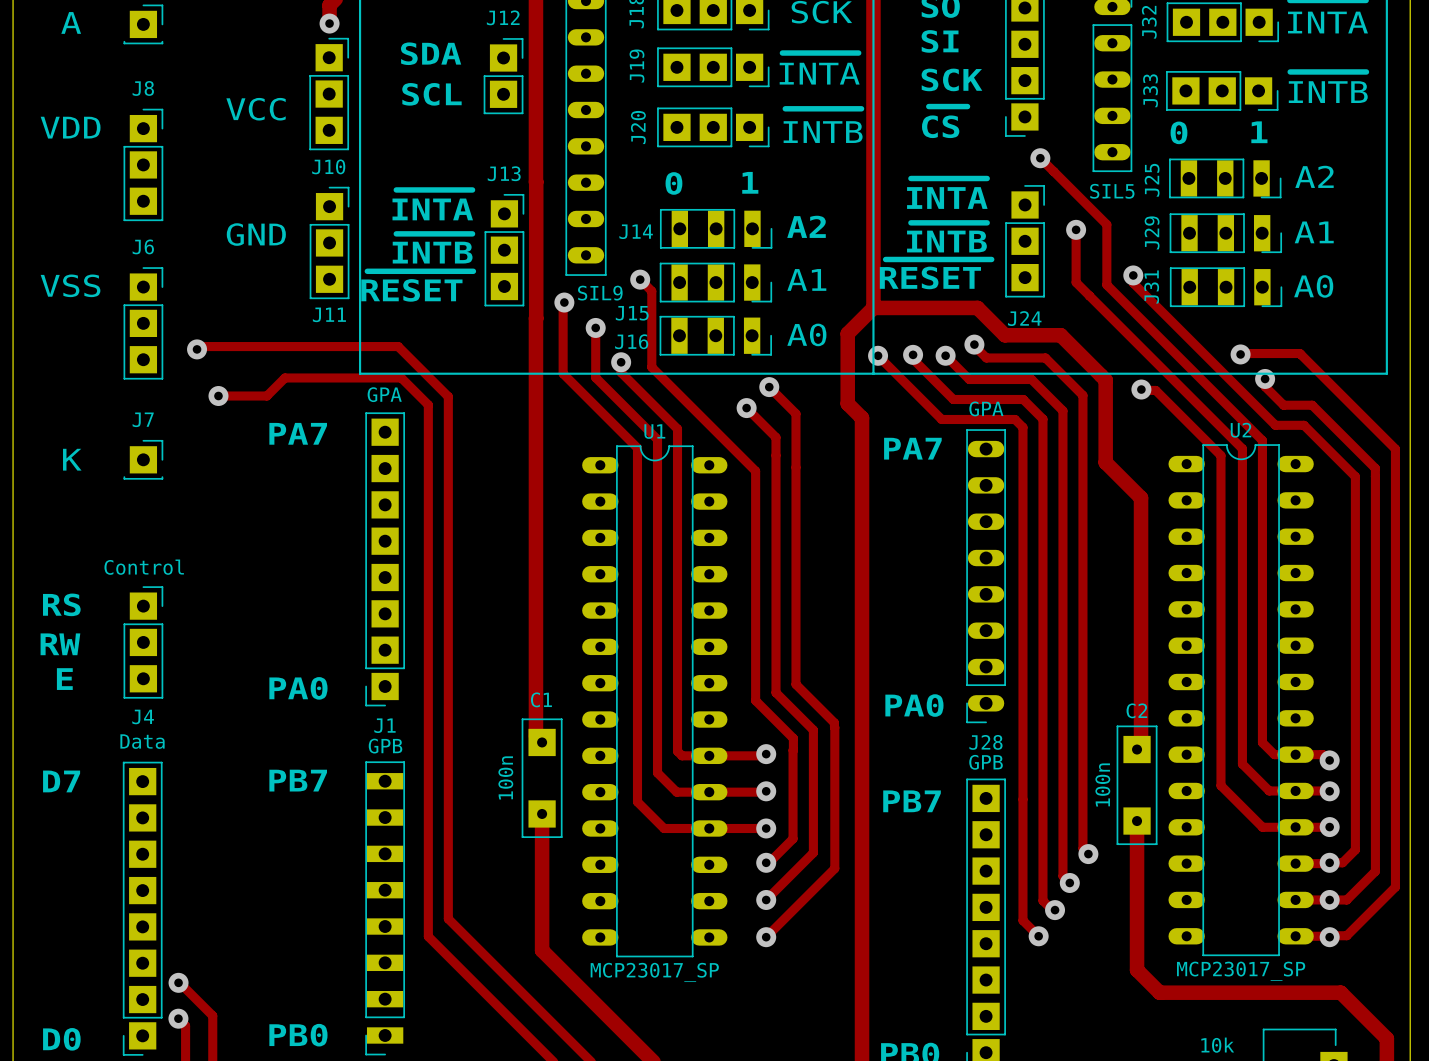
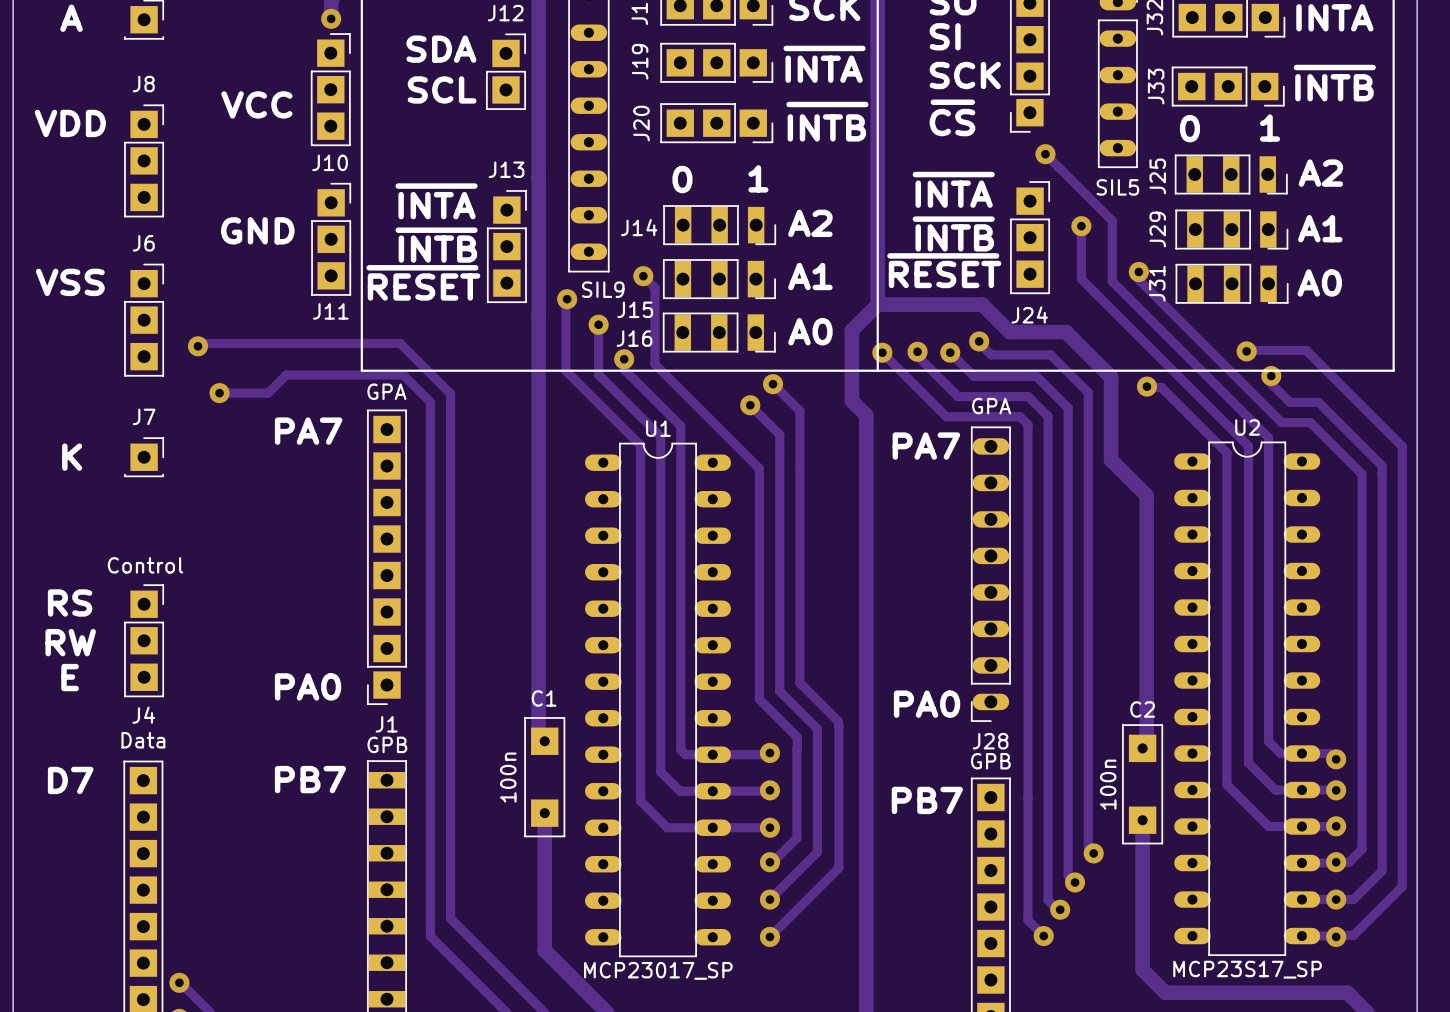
U2 value: MCP23017_SP (1241, 971) -> MCP23S17_SP (1247, 969)

